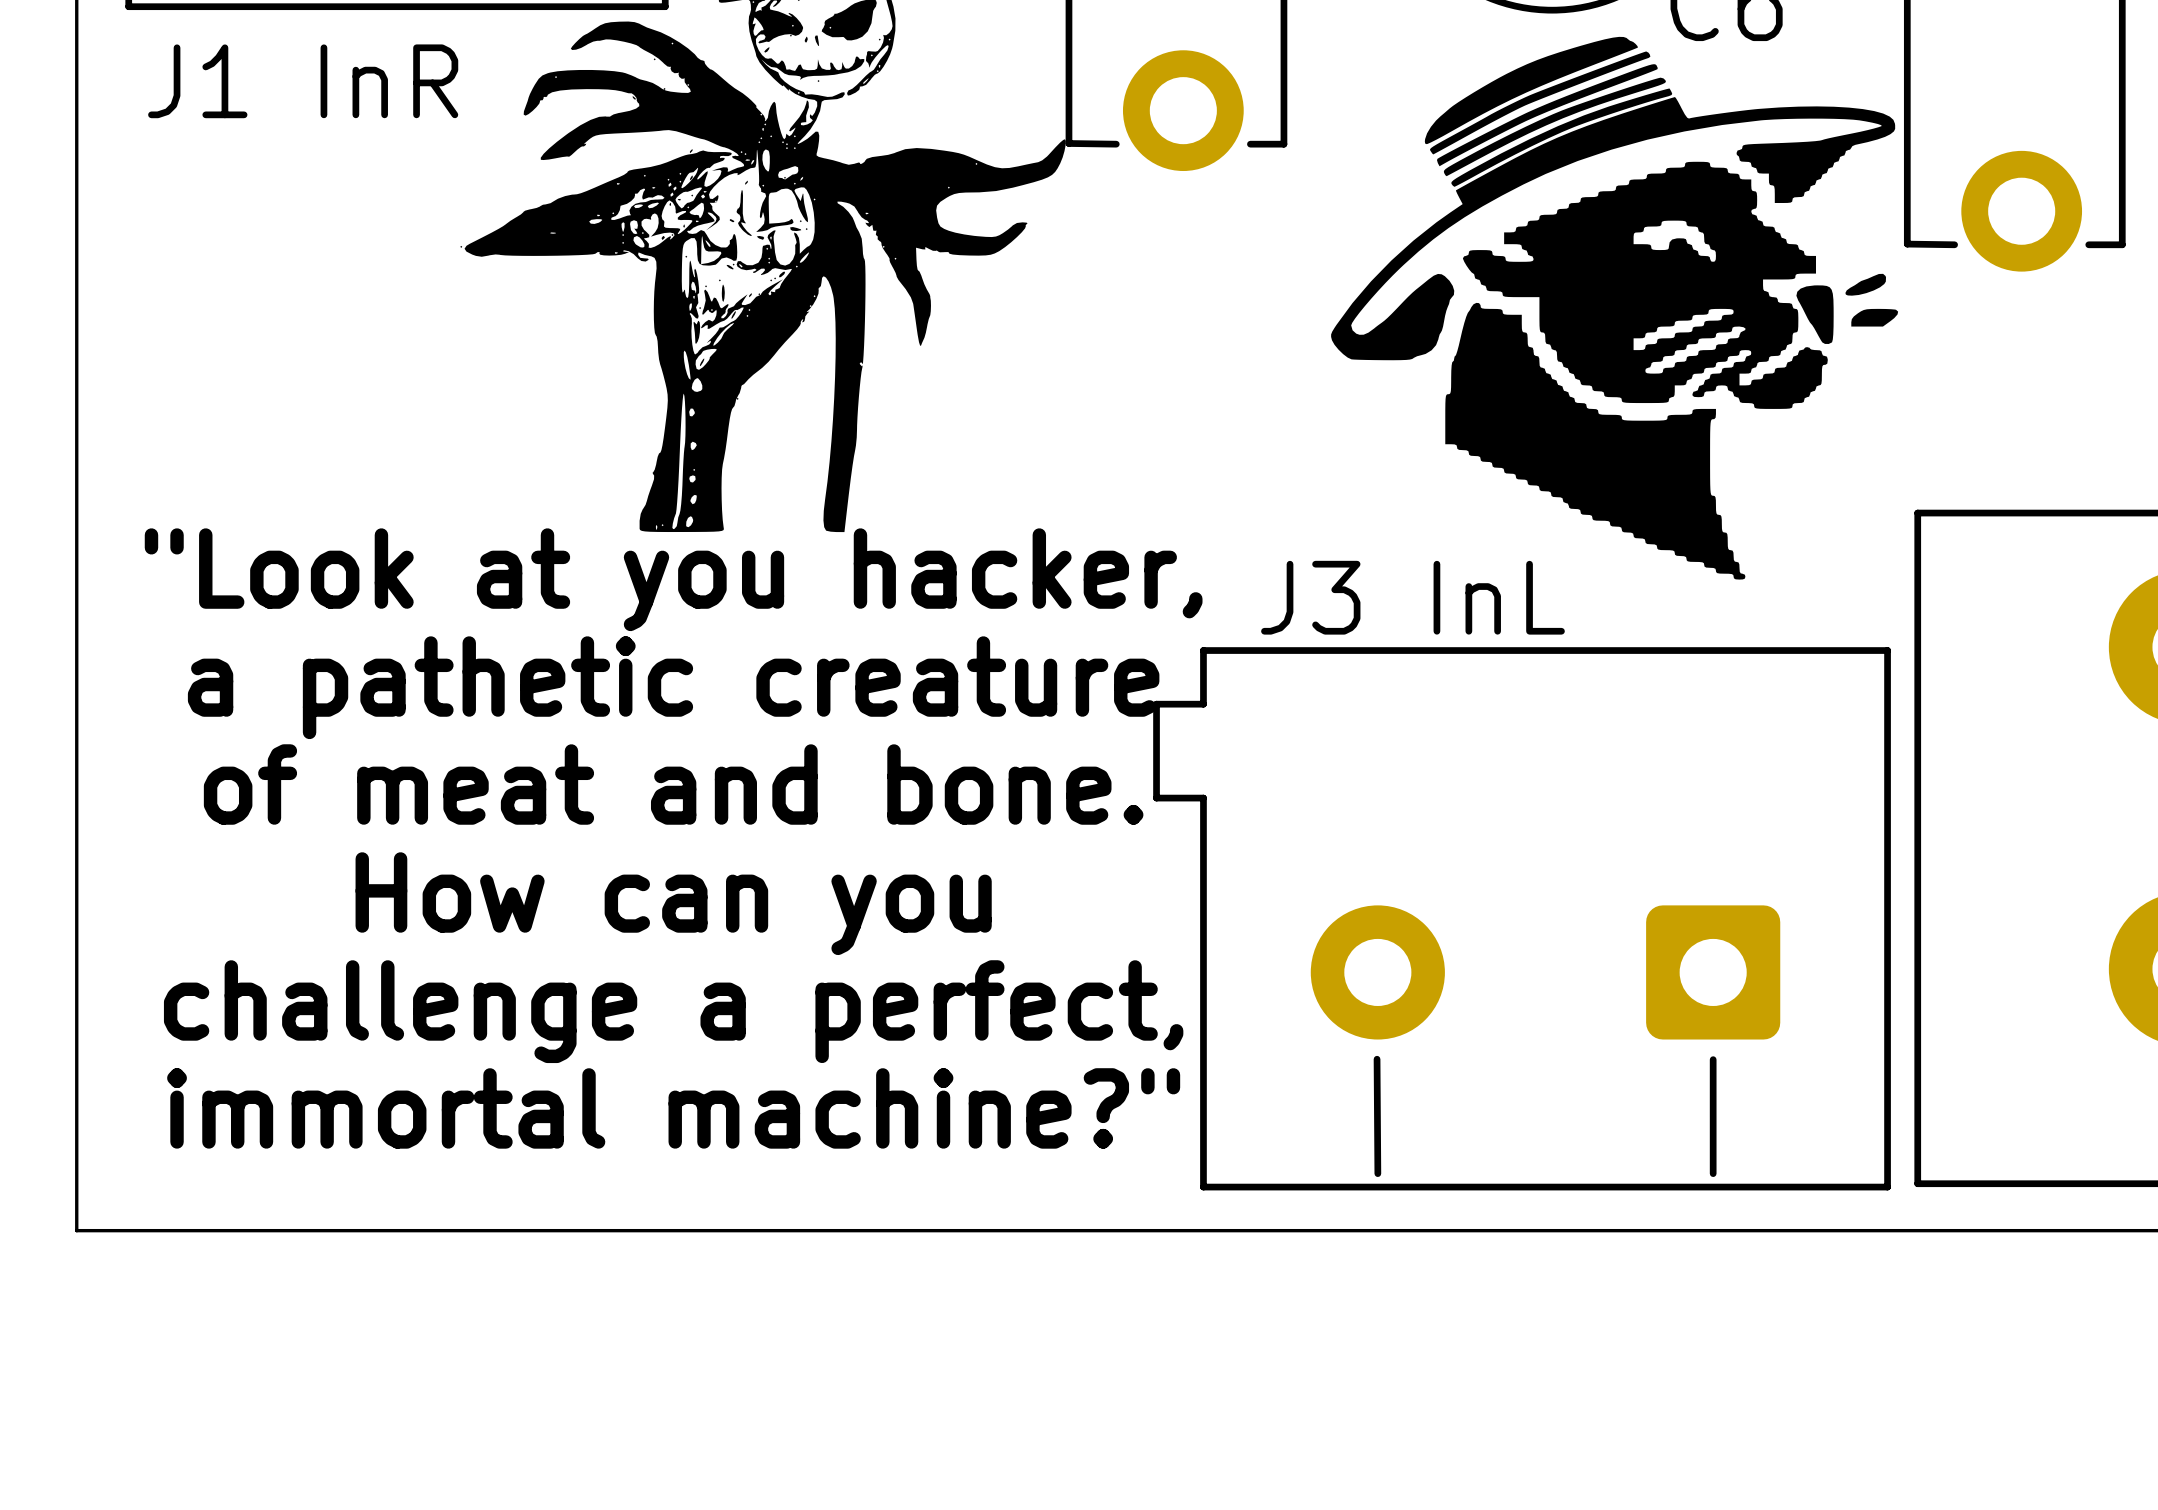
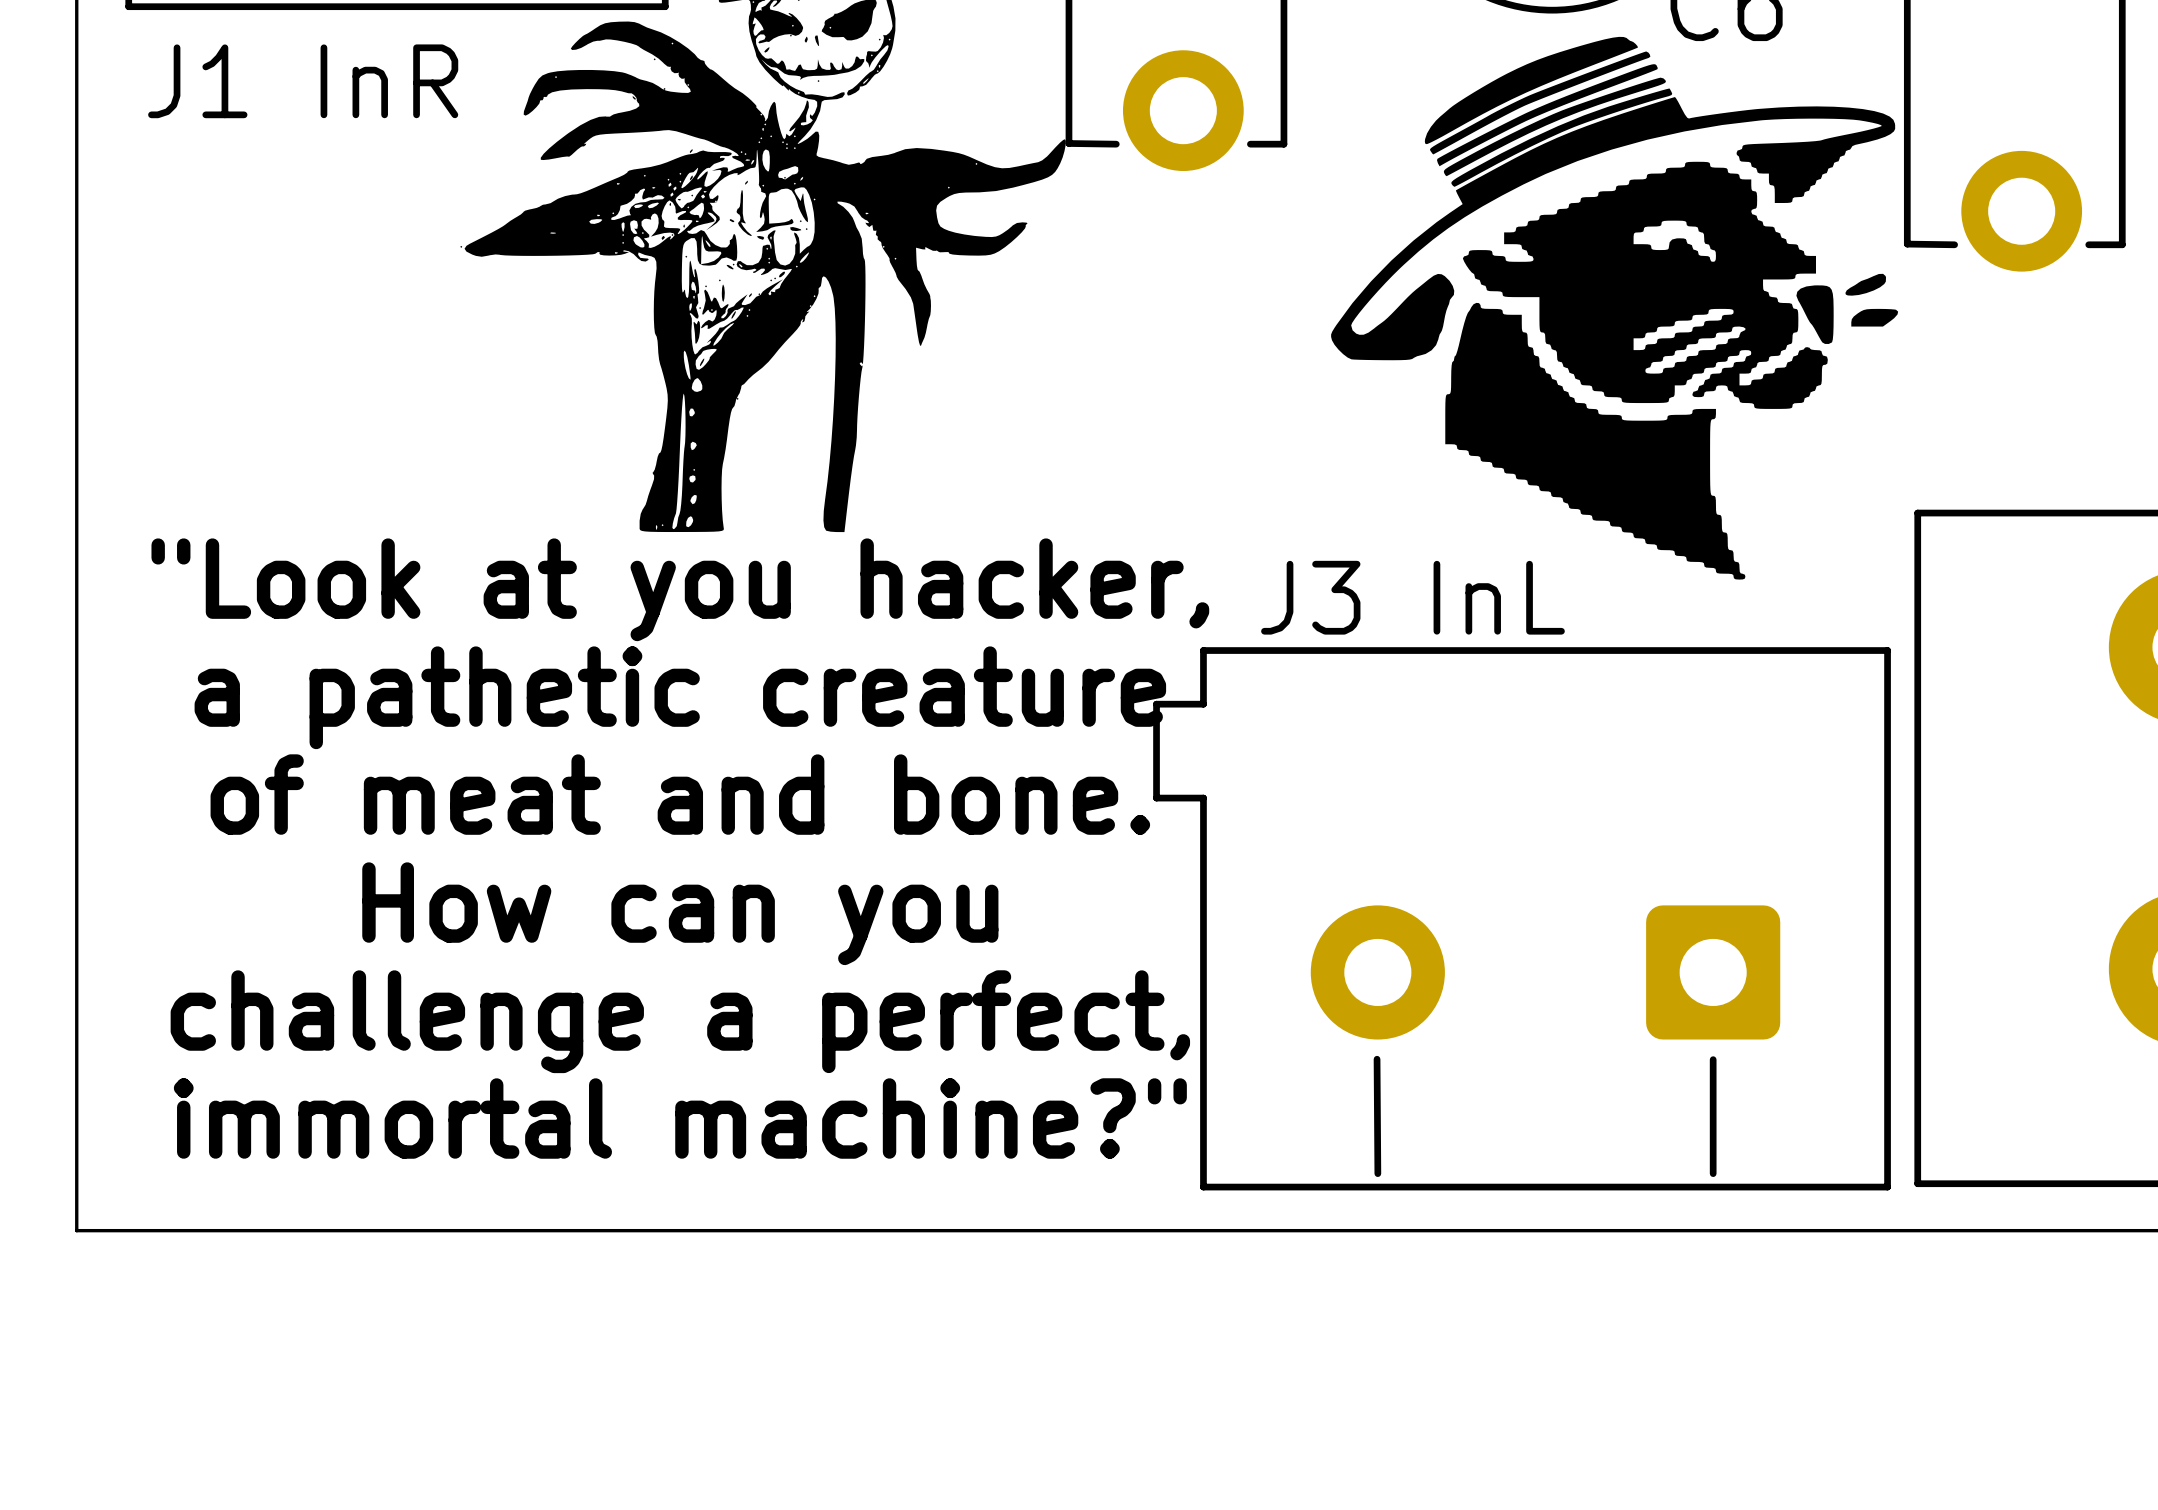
text position: "Look at you hacker, (673, 579) -> "Look at you hacker, (680, 589)
text position: a pathetic creature (673, 687) -> a pathetic creature (680, 697)
text position: of meat and bone. (673, 784) -> of meat and bone. (680, 794)
text position: How can you (673, 903) -> How can you (680, 913)
text position: challenge a perfect, (673, 1011) -> challenge a perfect, (680, 1021)
text position: immortal machine?" (673, 1108) -> immortal machine?" (680, 1118)

